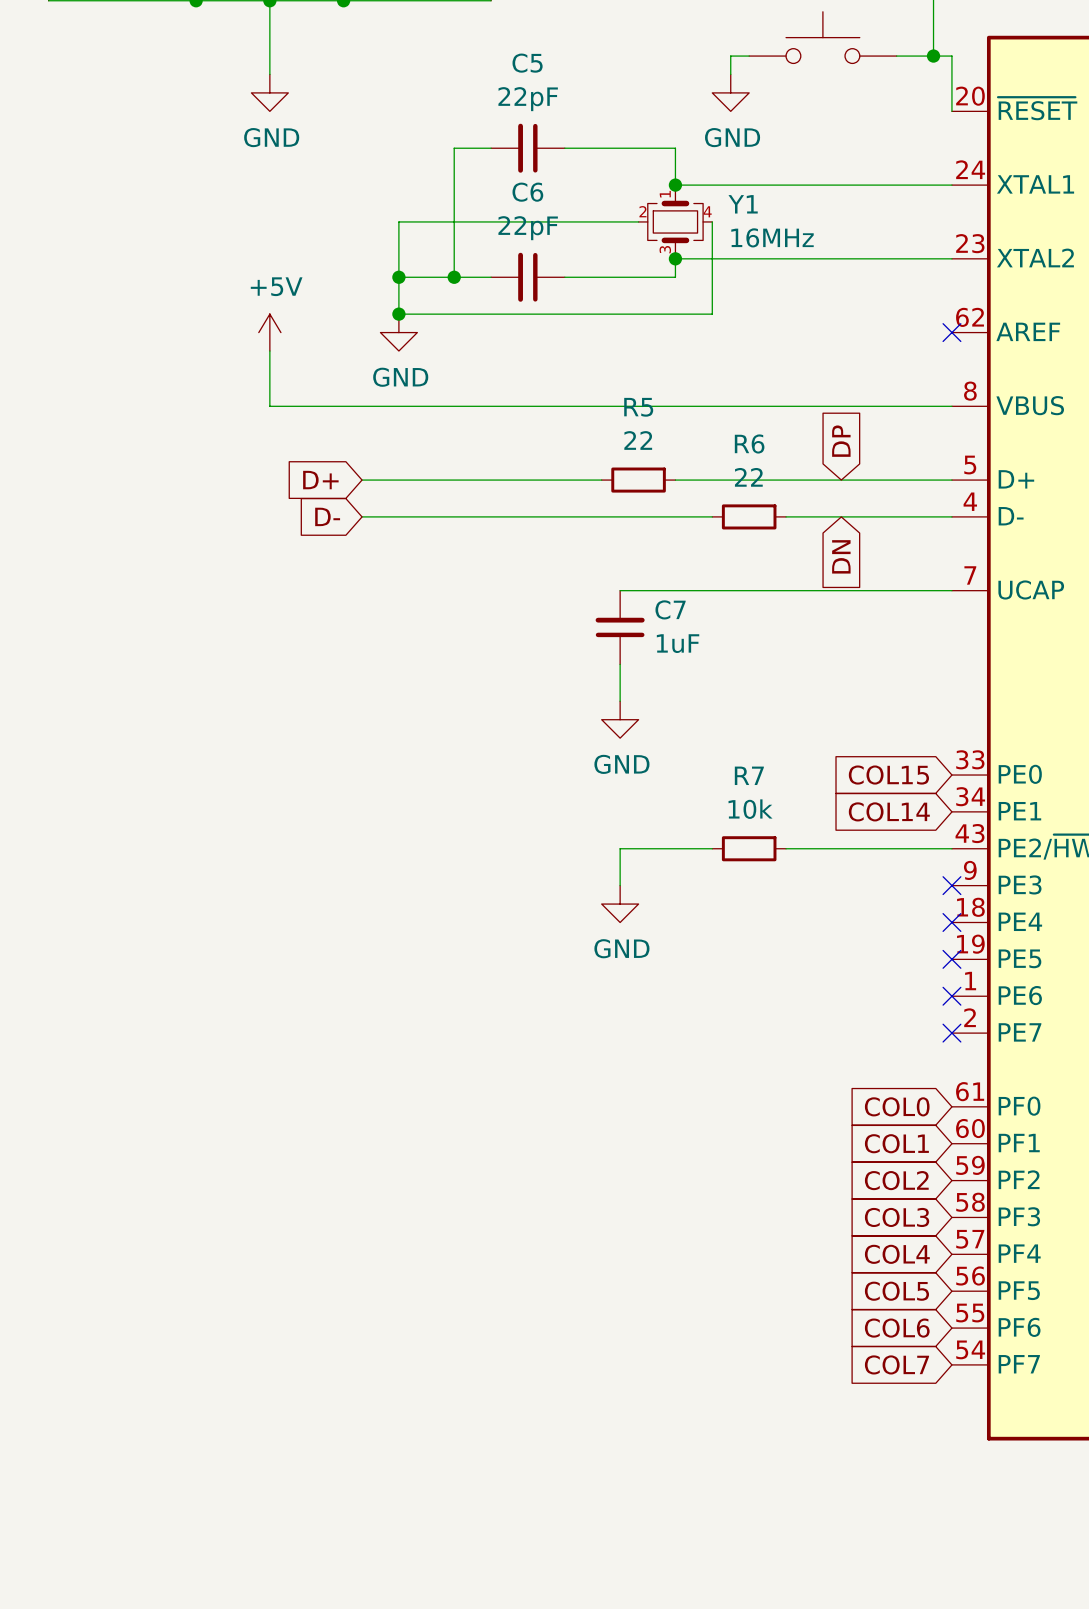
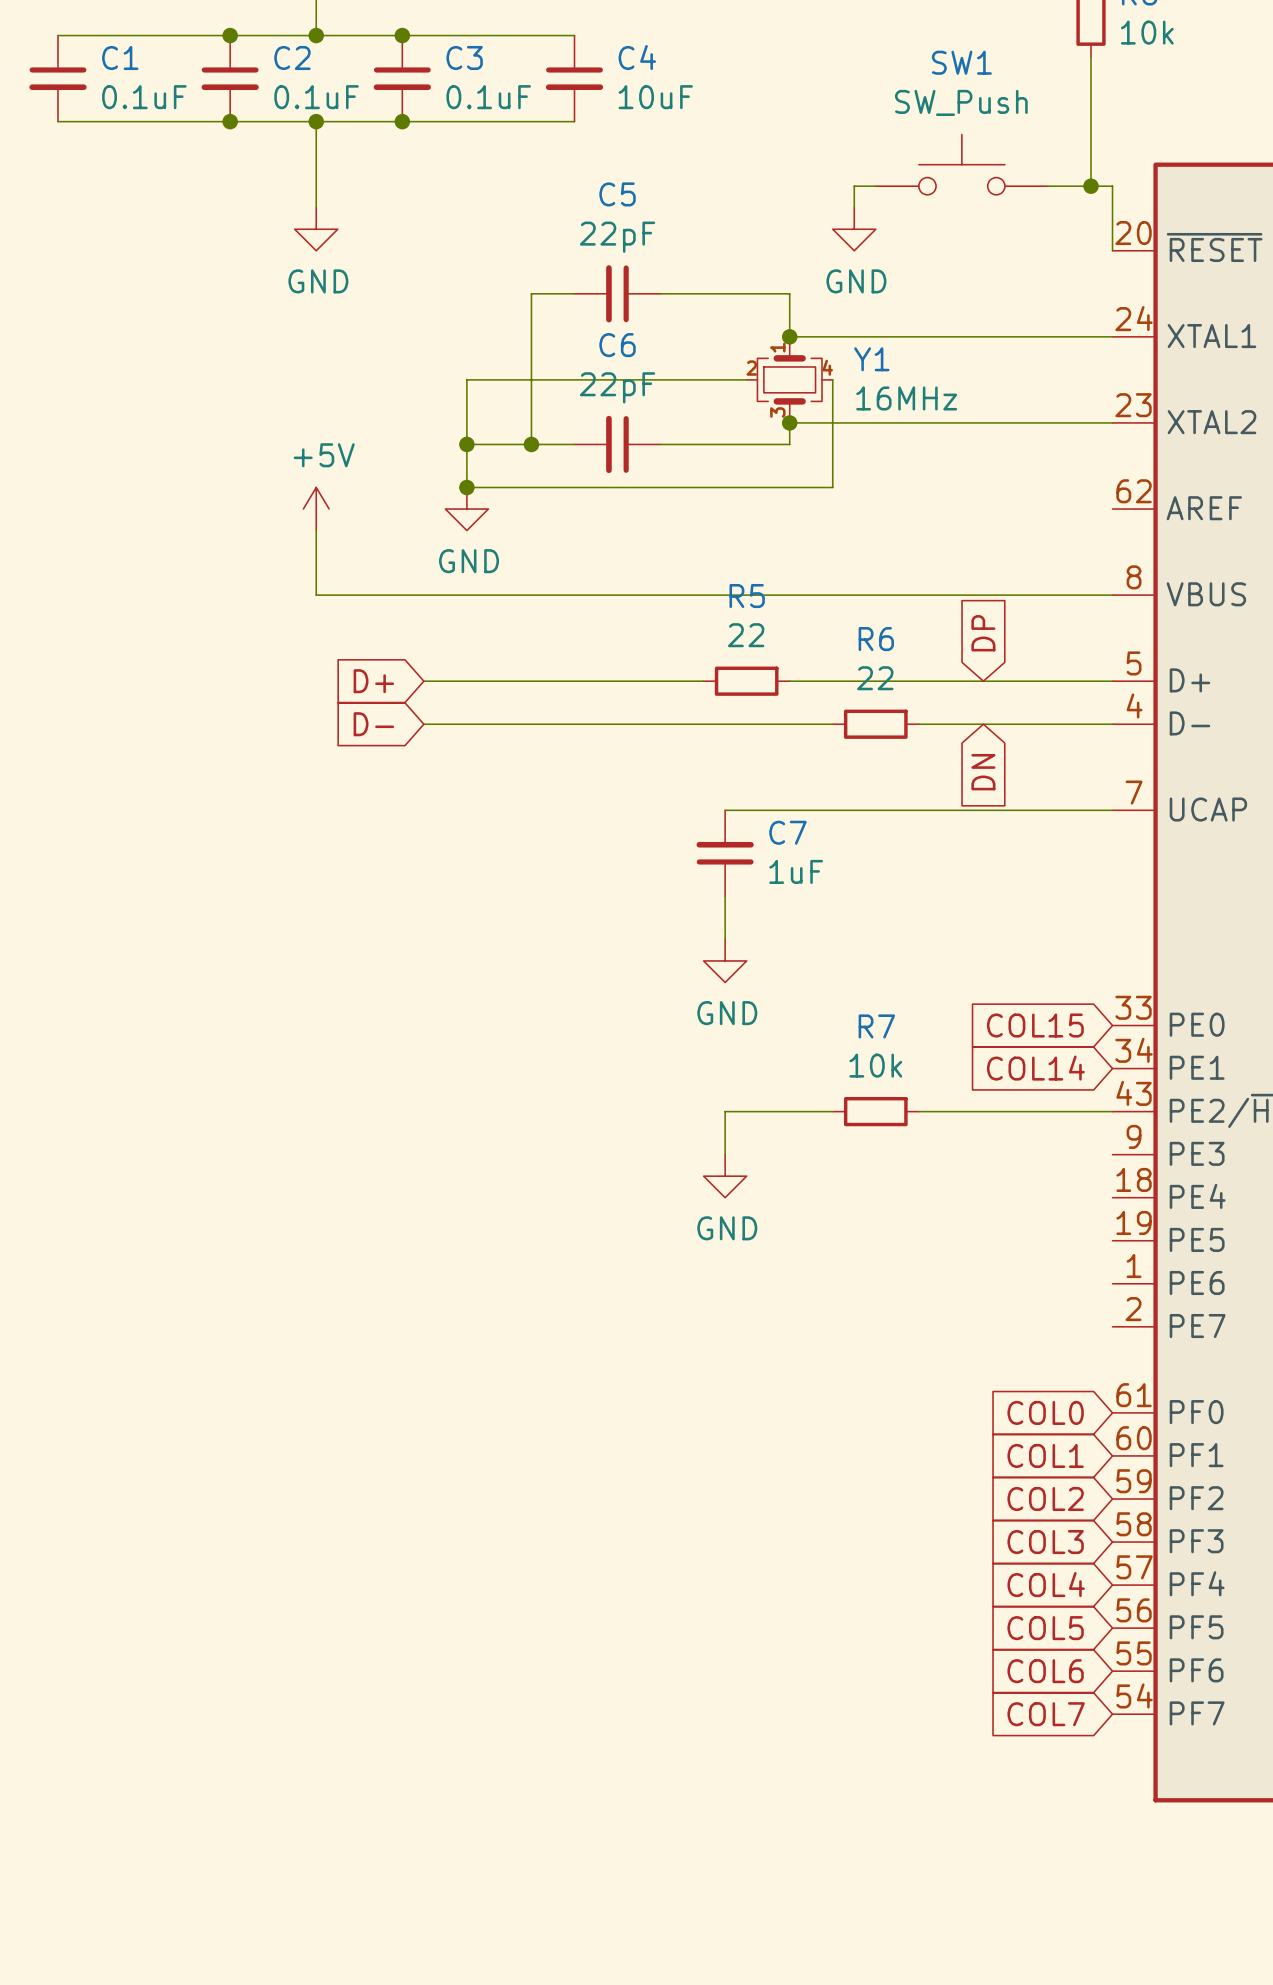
no-connect mark: (951, 332) -> none
no-connect mark: (951, 885) -> none
no-connect mark: (951, 922) -> none
no-connect mark: (951, 959) -> none
no-connect mark: (951, 996) -> none
no-connect mark: (951, 1033) -> none

